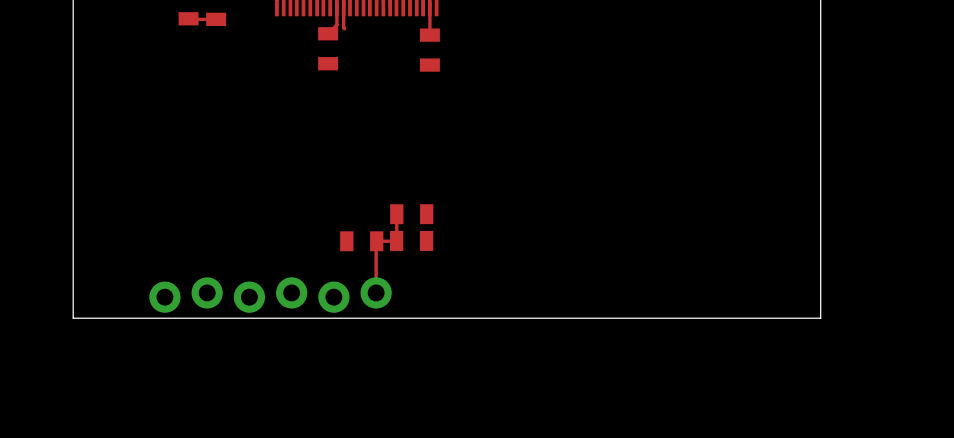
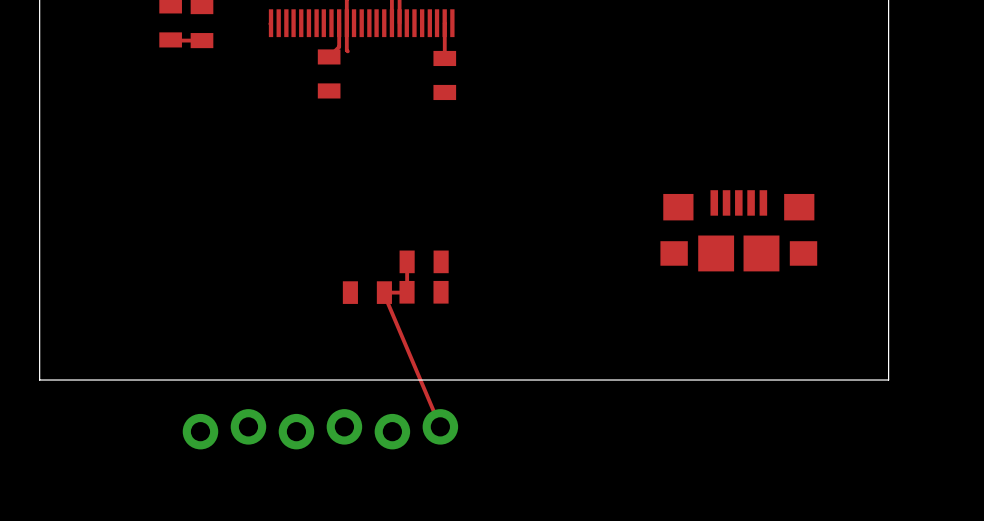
part: none -> (738, 230)
top track: (376, 241) (376, 292) -> (383, 293) (440, 426)
part position: (270, 295) -> (320, 429)

